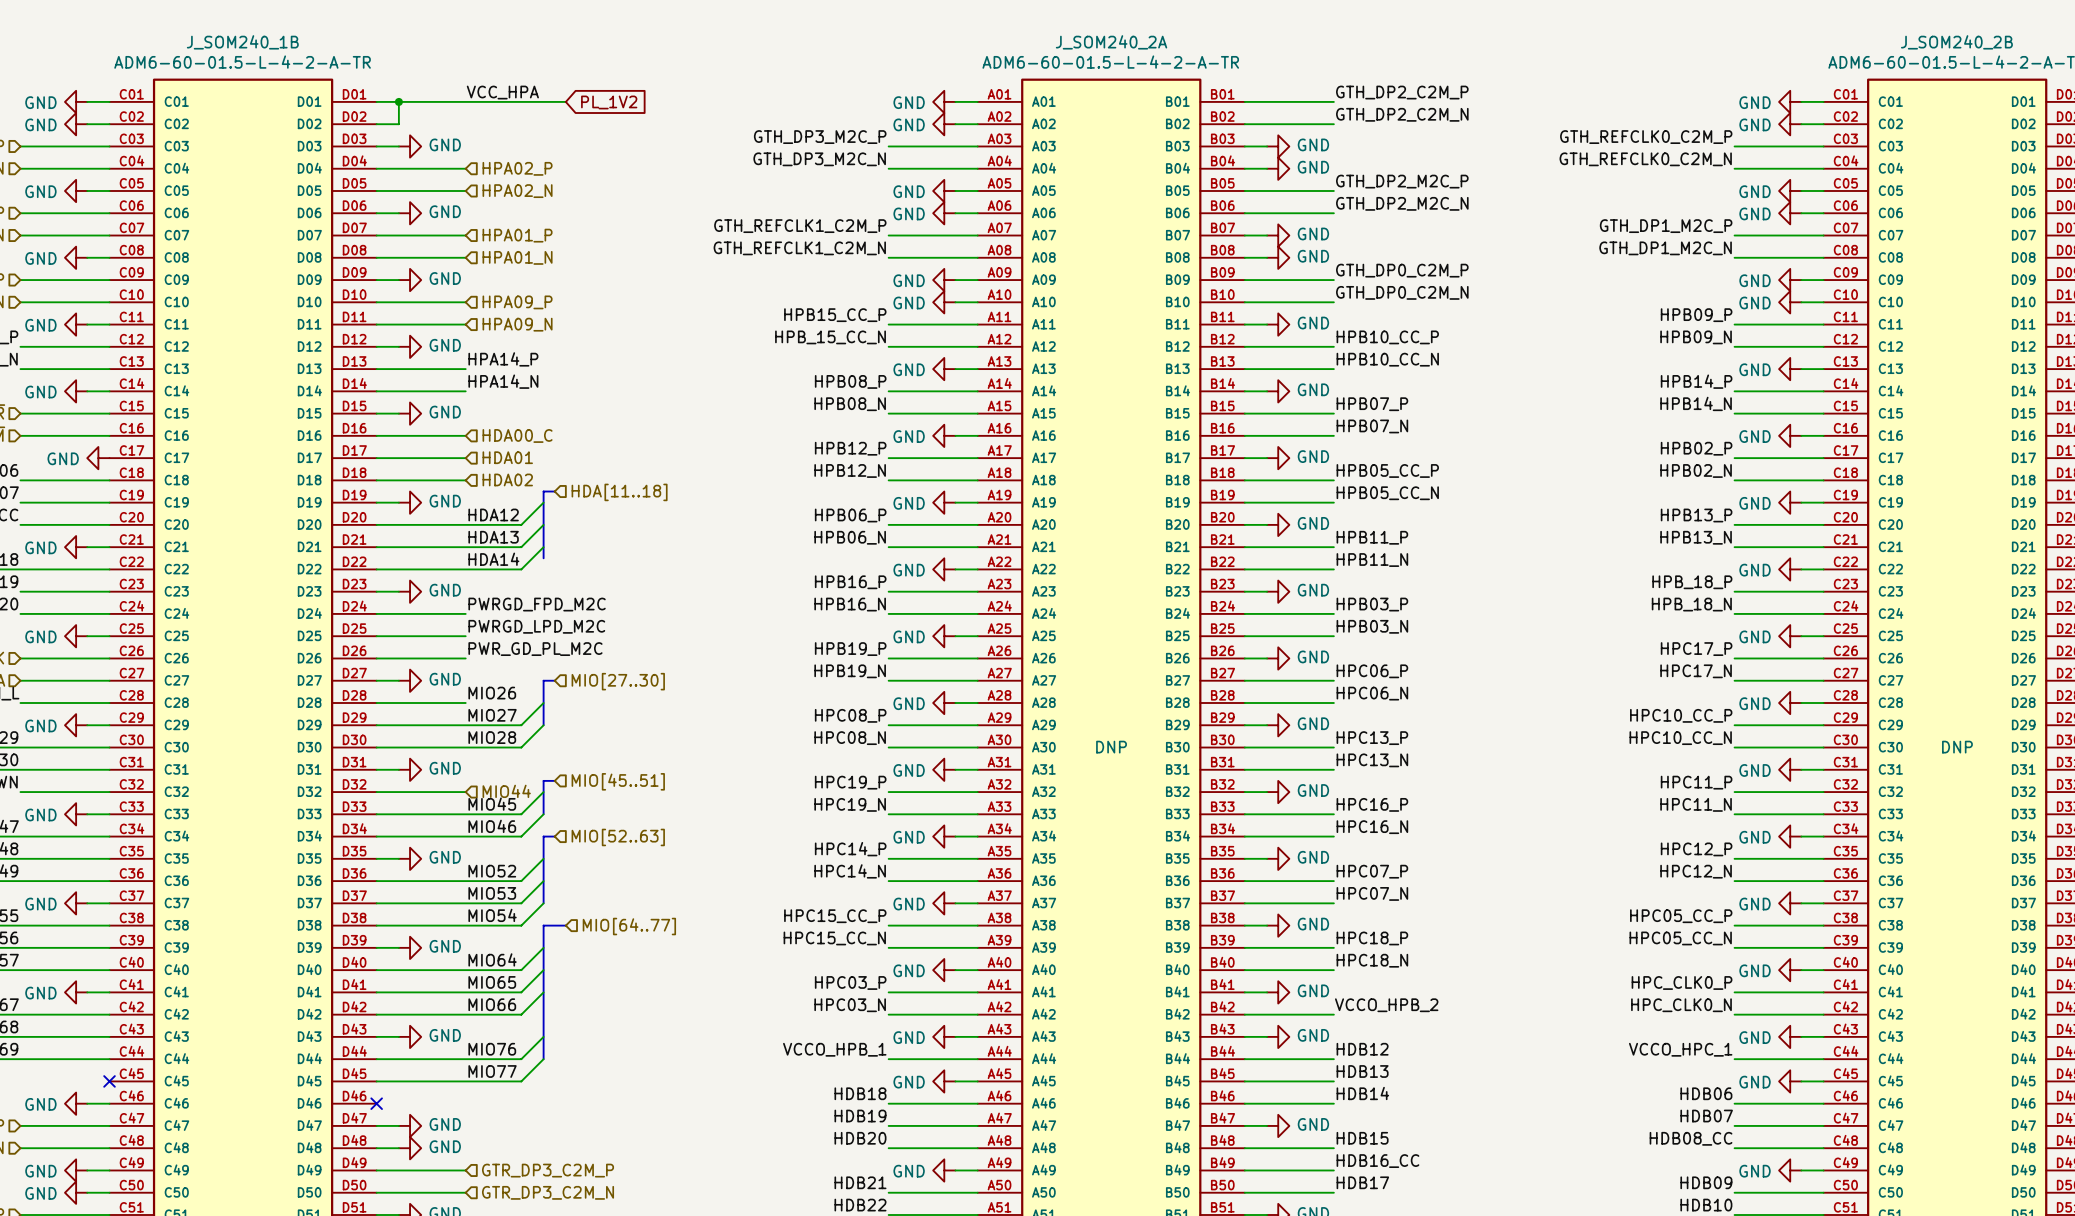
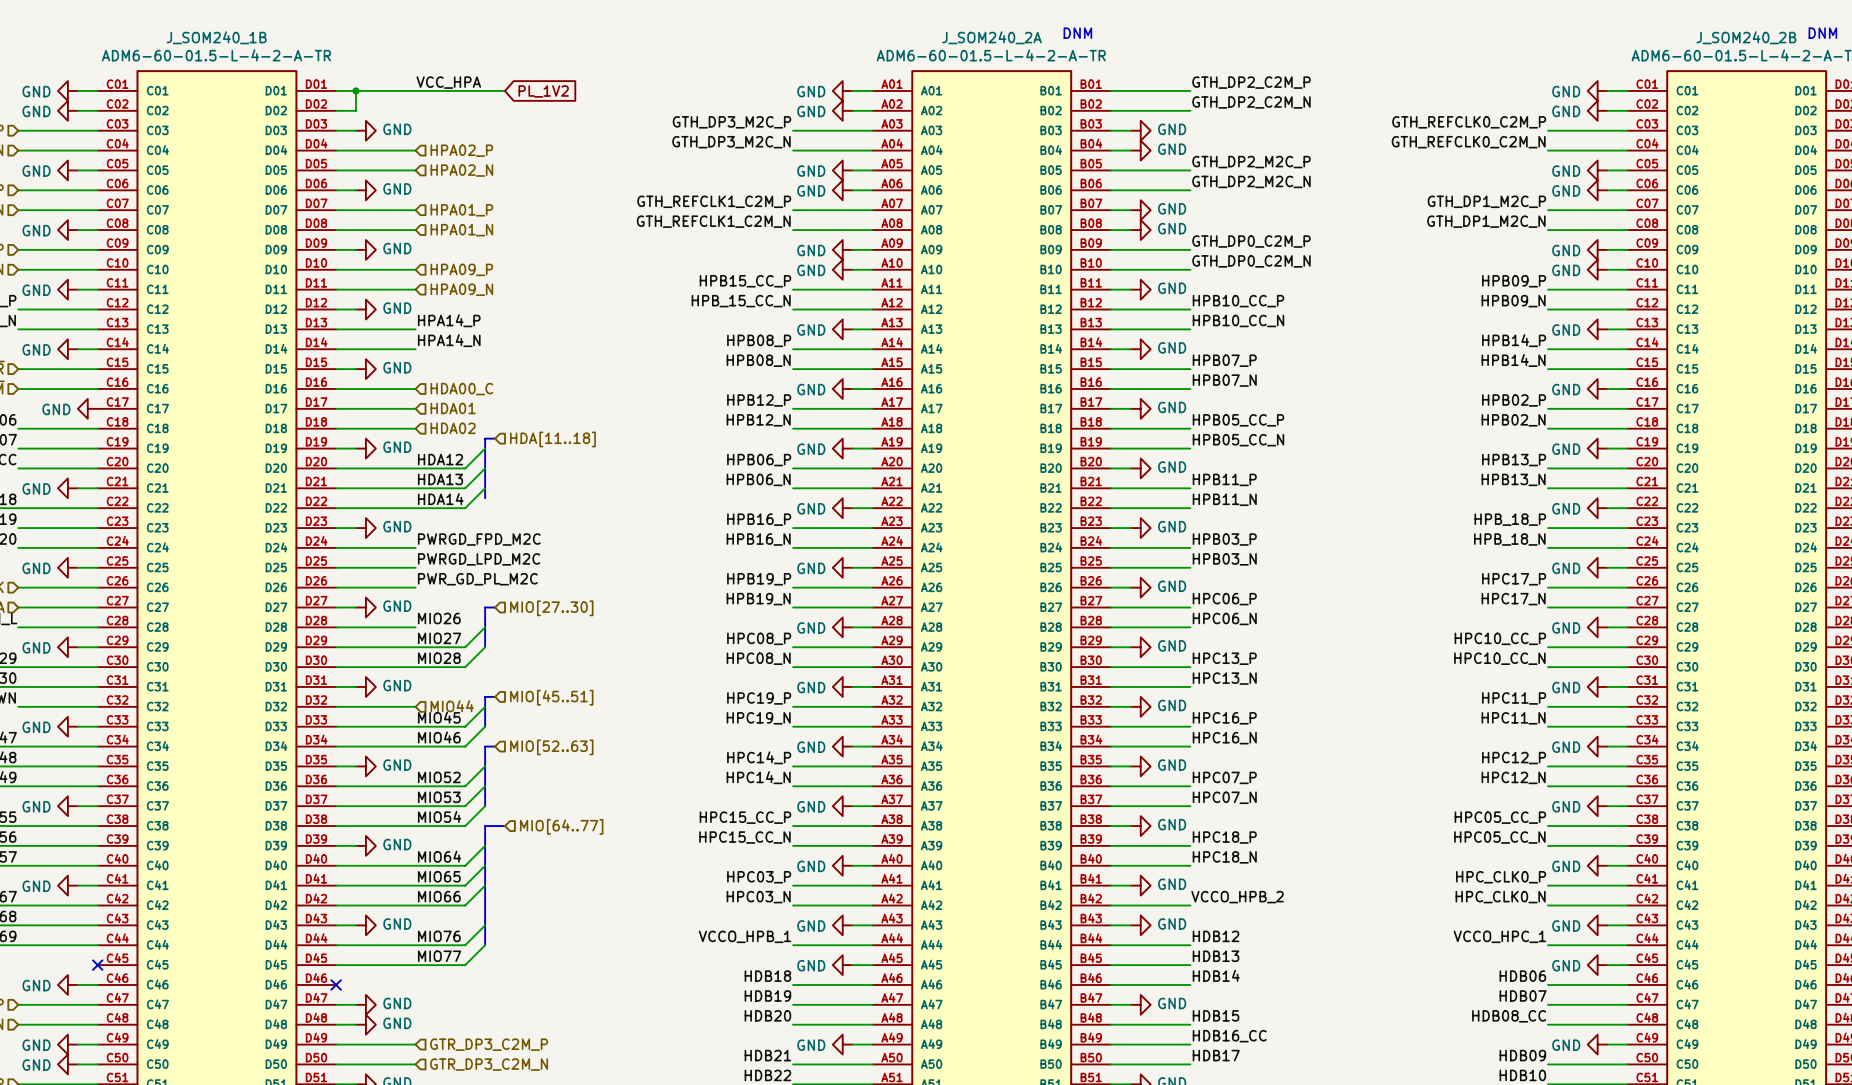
text: none -> DNM (1077, 33)
text: none -> DNM (1822, 33)
J_SOM240_2A text: DNP (1111, 747) -> none
J_SOM240_2B text: DNP (1957, 747) -> none

